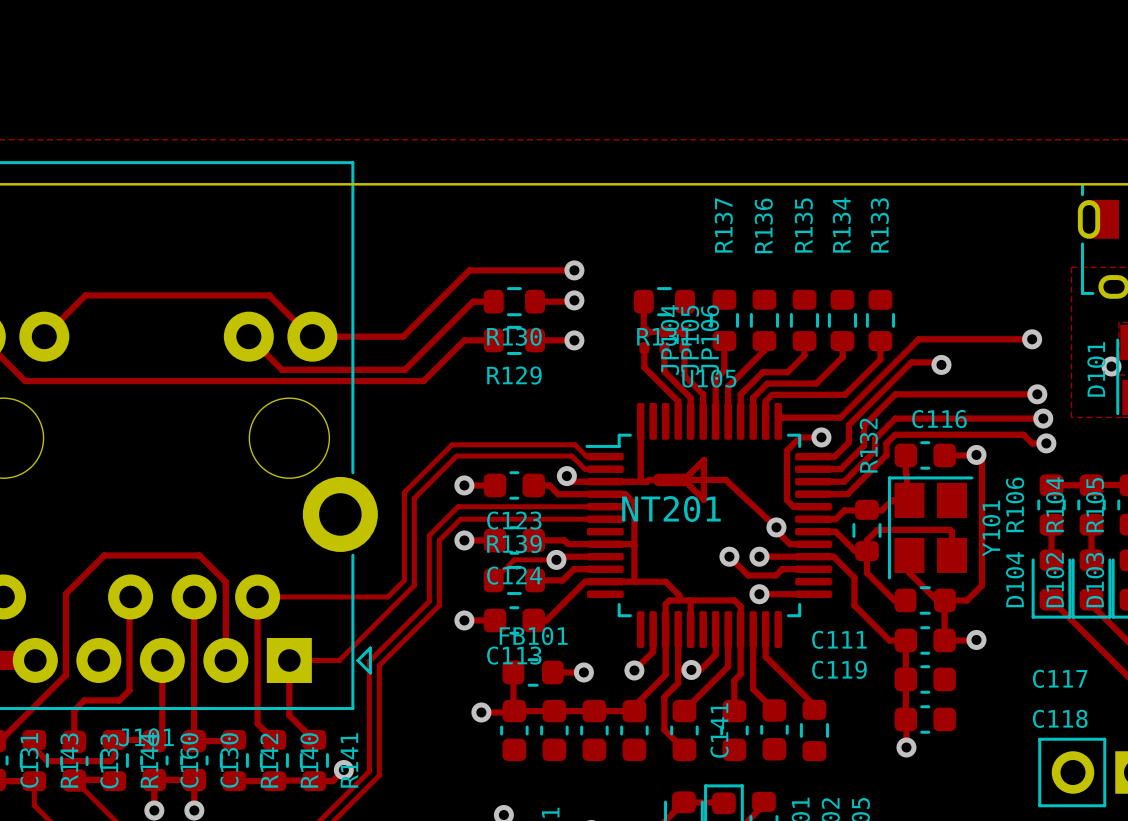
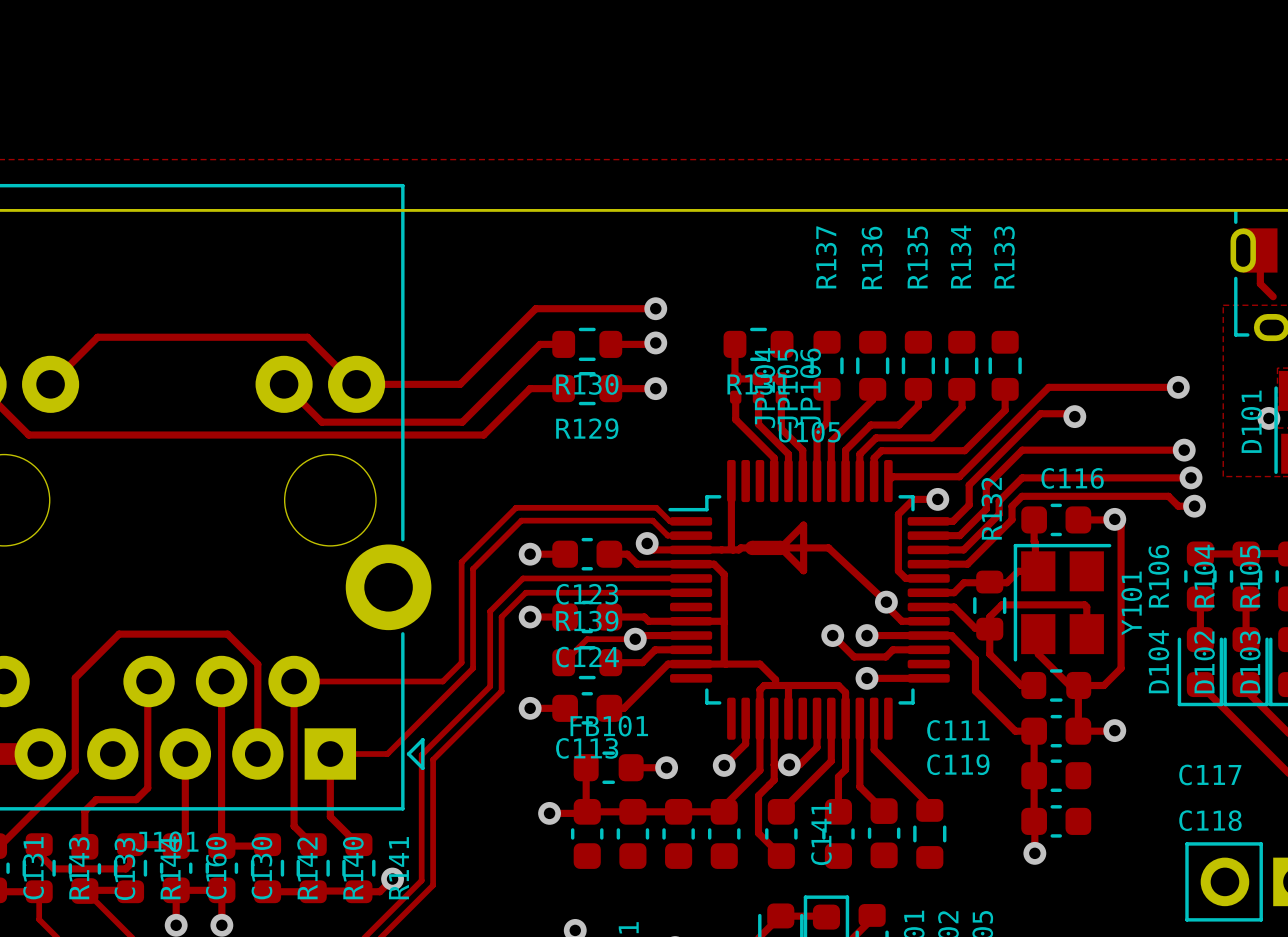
track: none -> (1260, 250) (1260, 283) (1273, 296)
NT201 name: NT201 (671, 509) -> none

